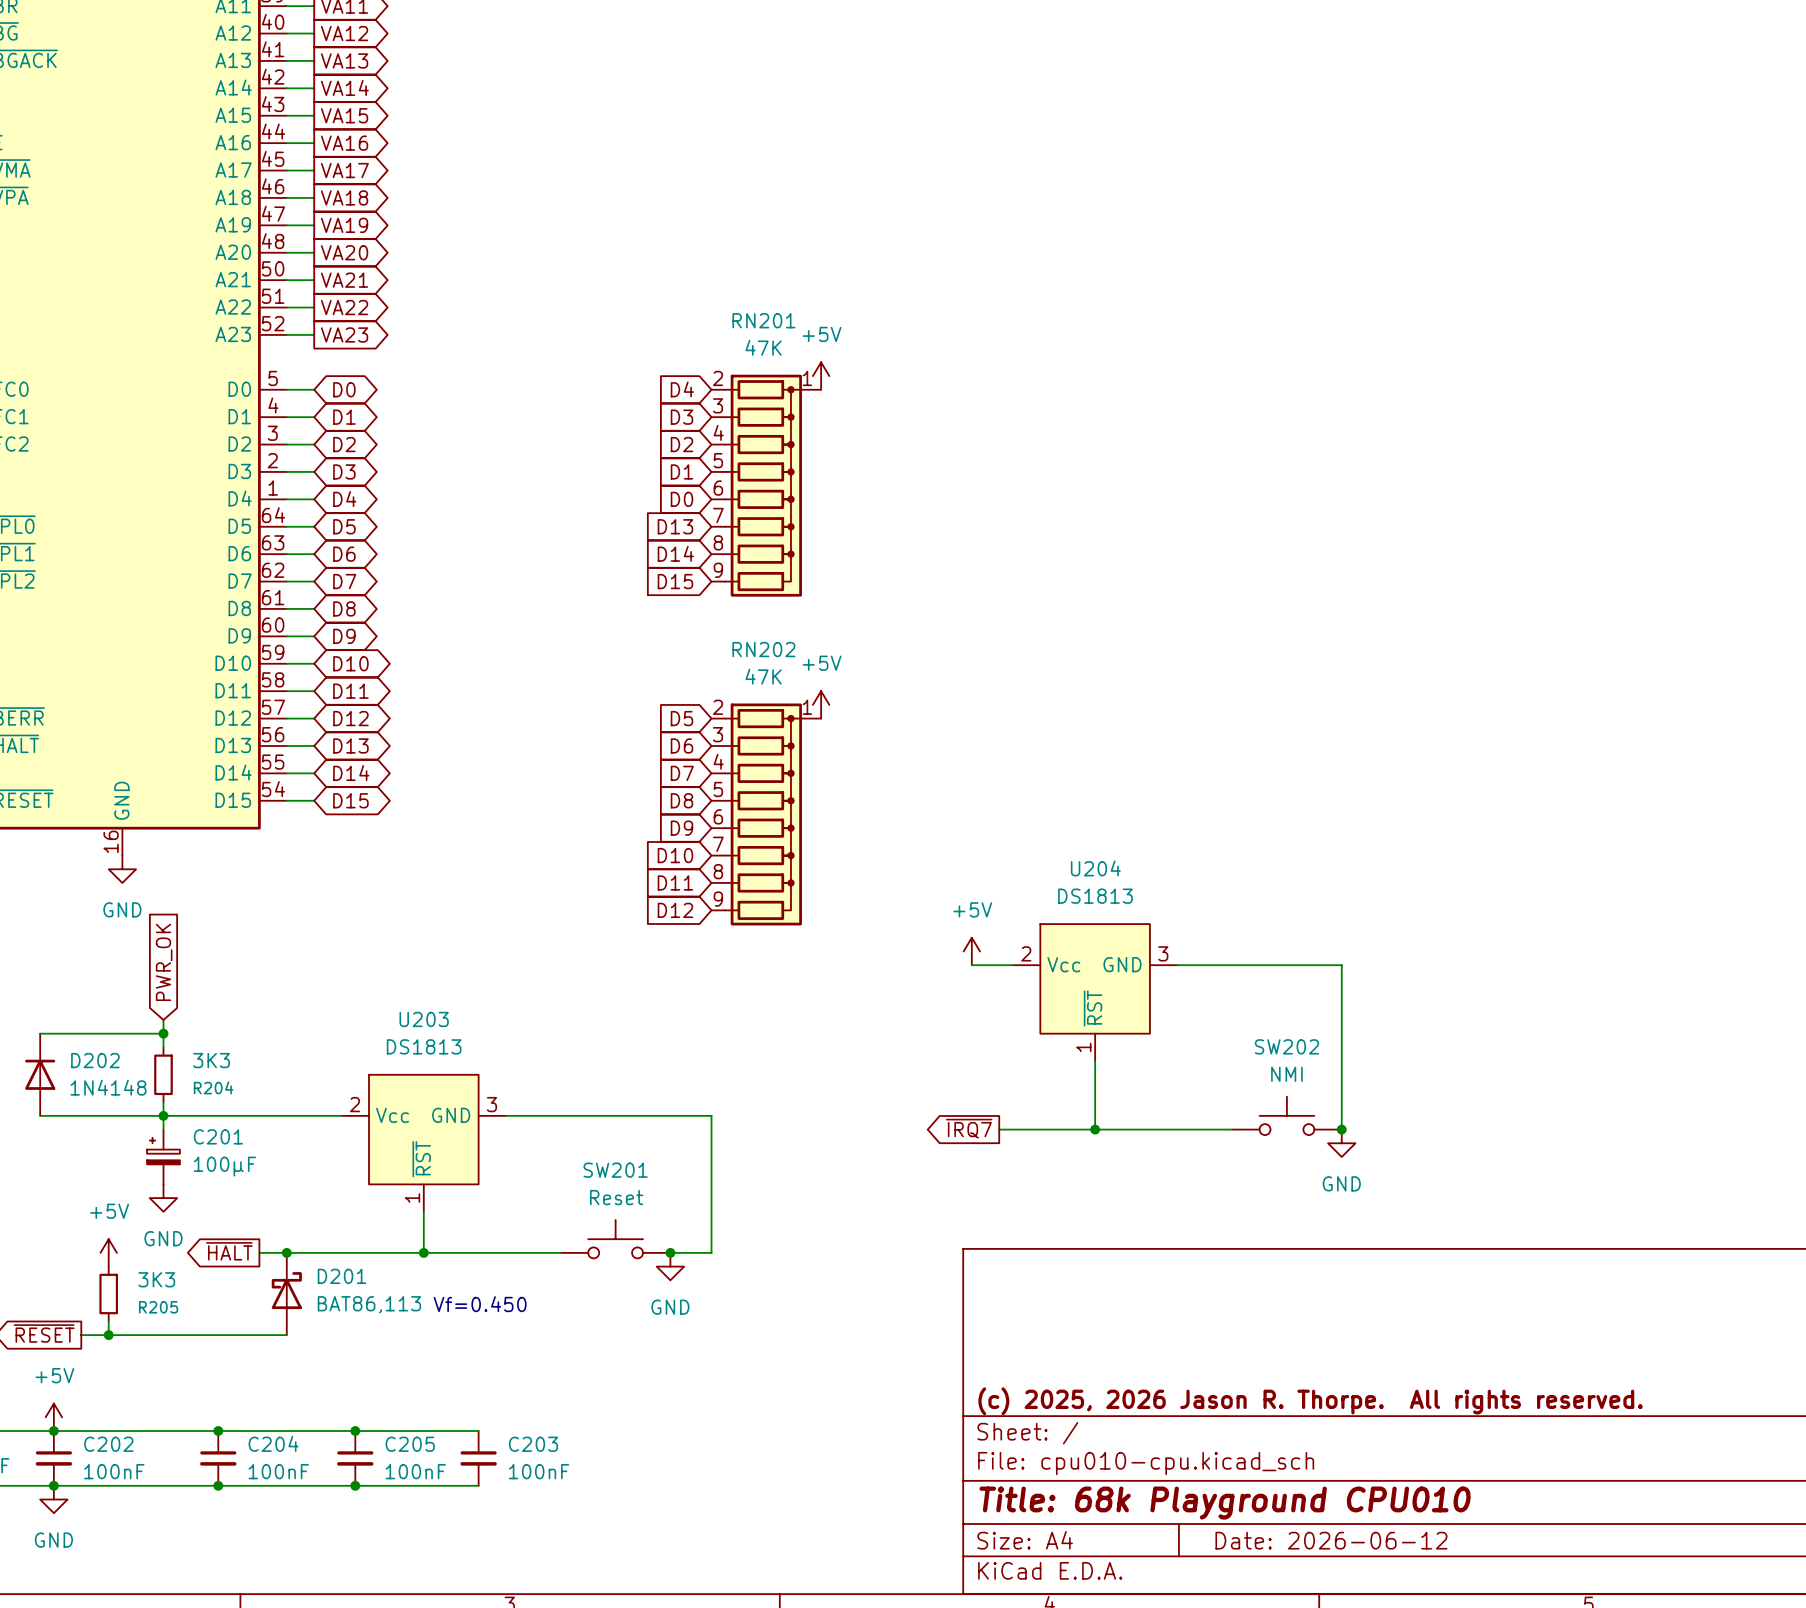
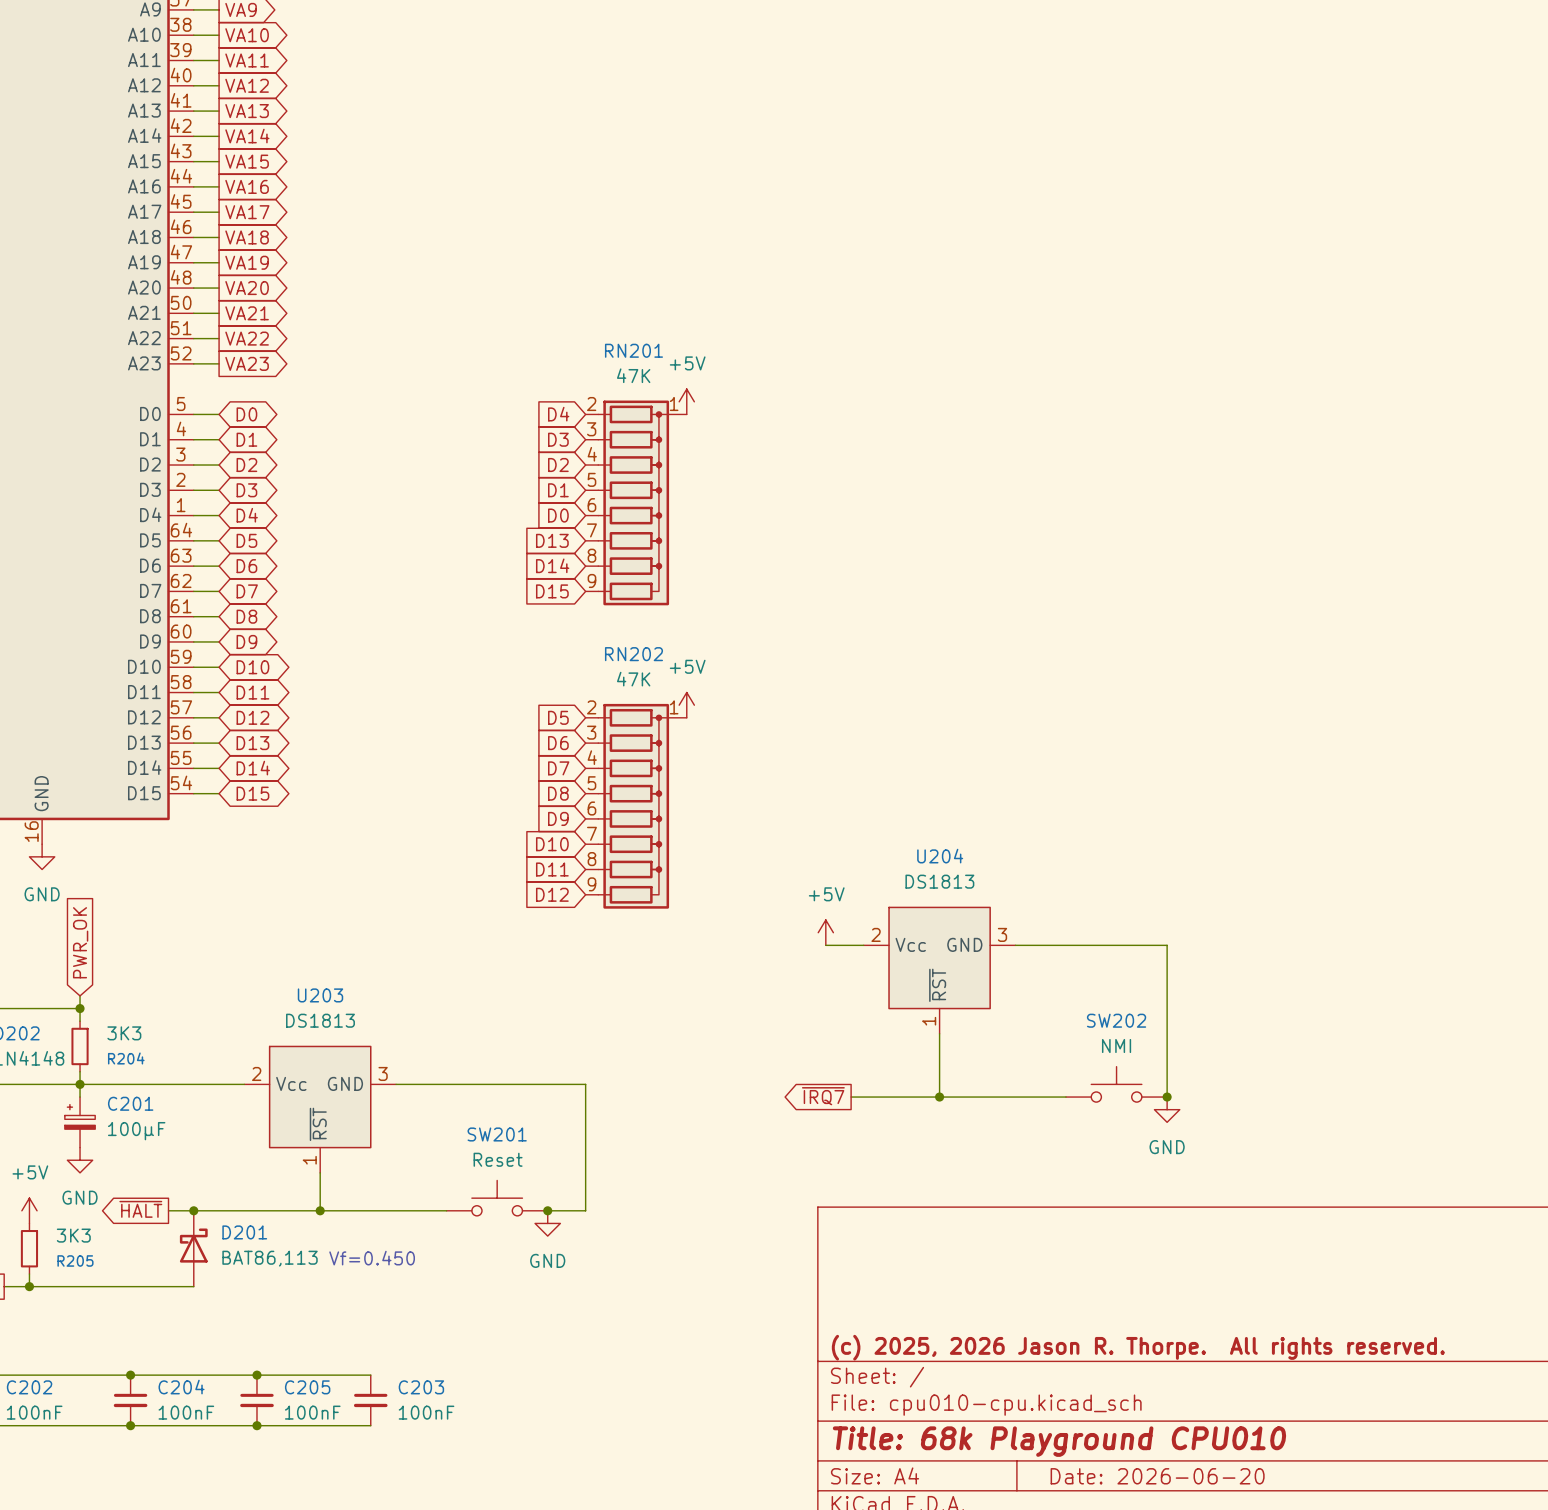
title block: Date: 2026-06-12 (1331, 1540) -> Date: 2026-06-20 (1157, 1476)

